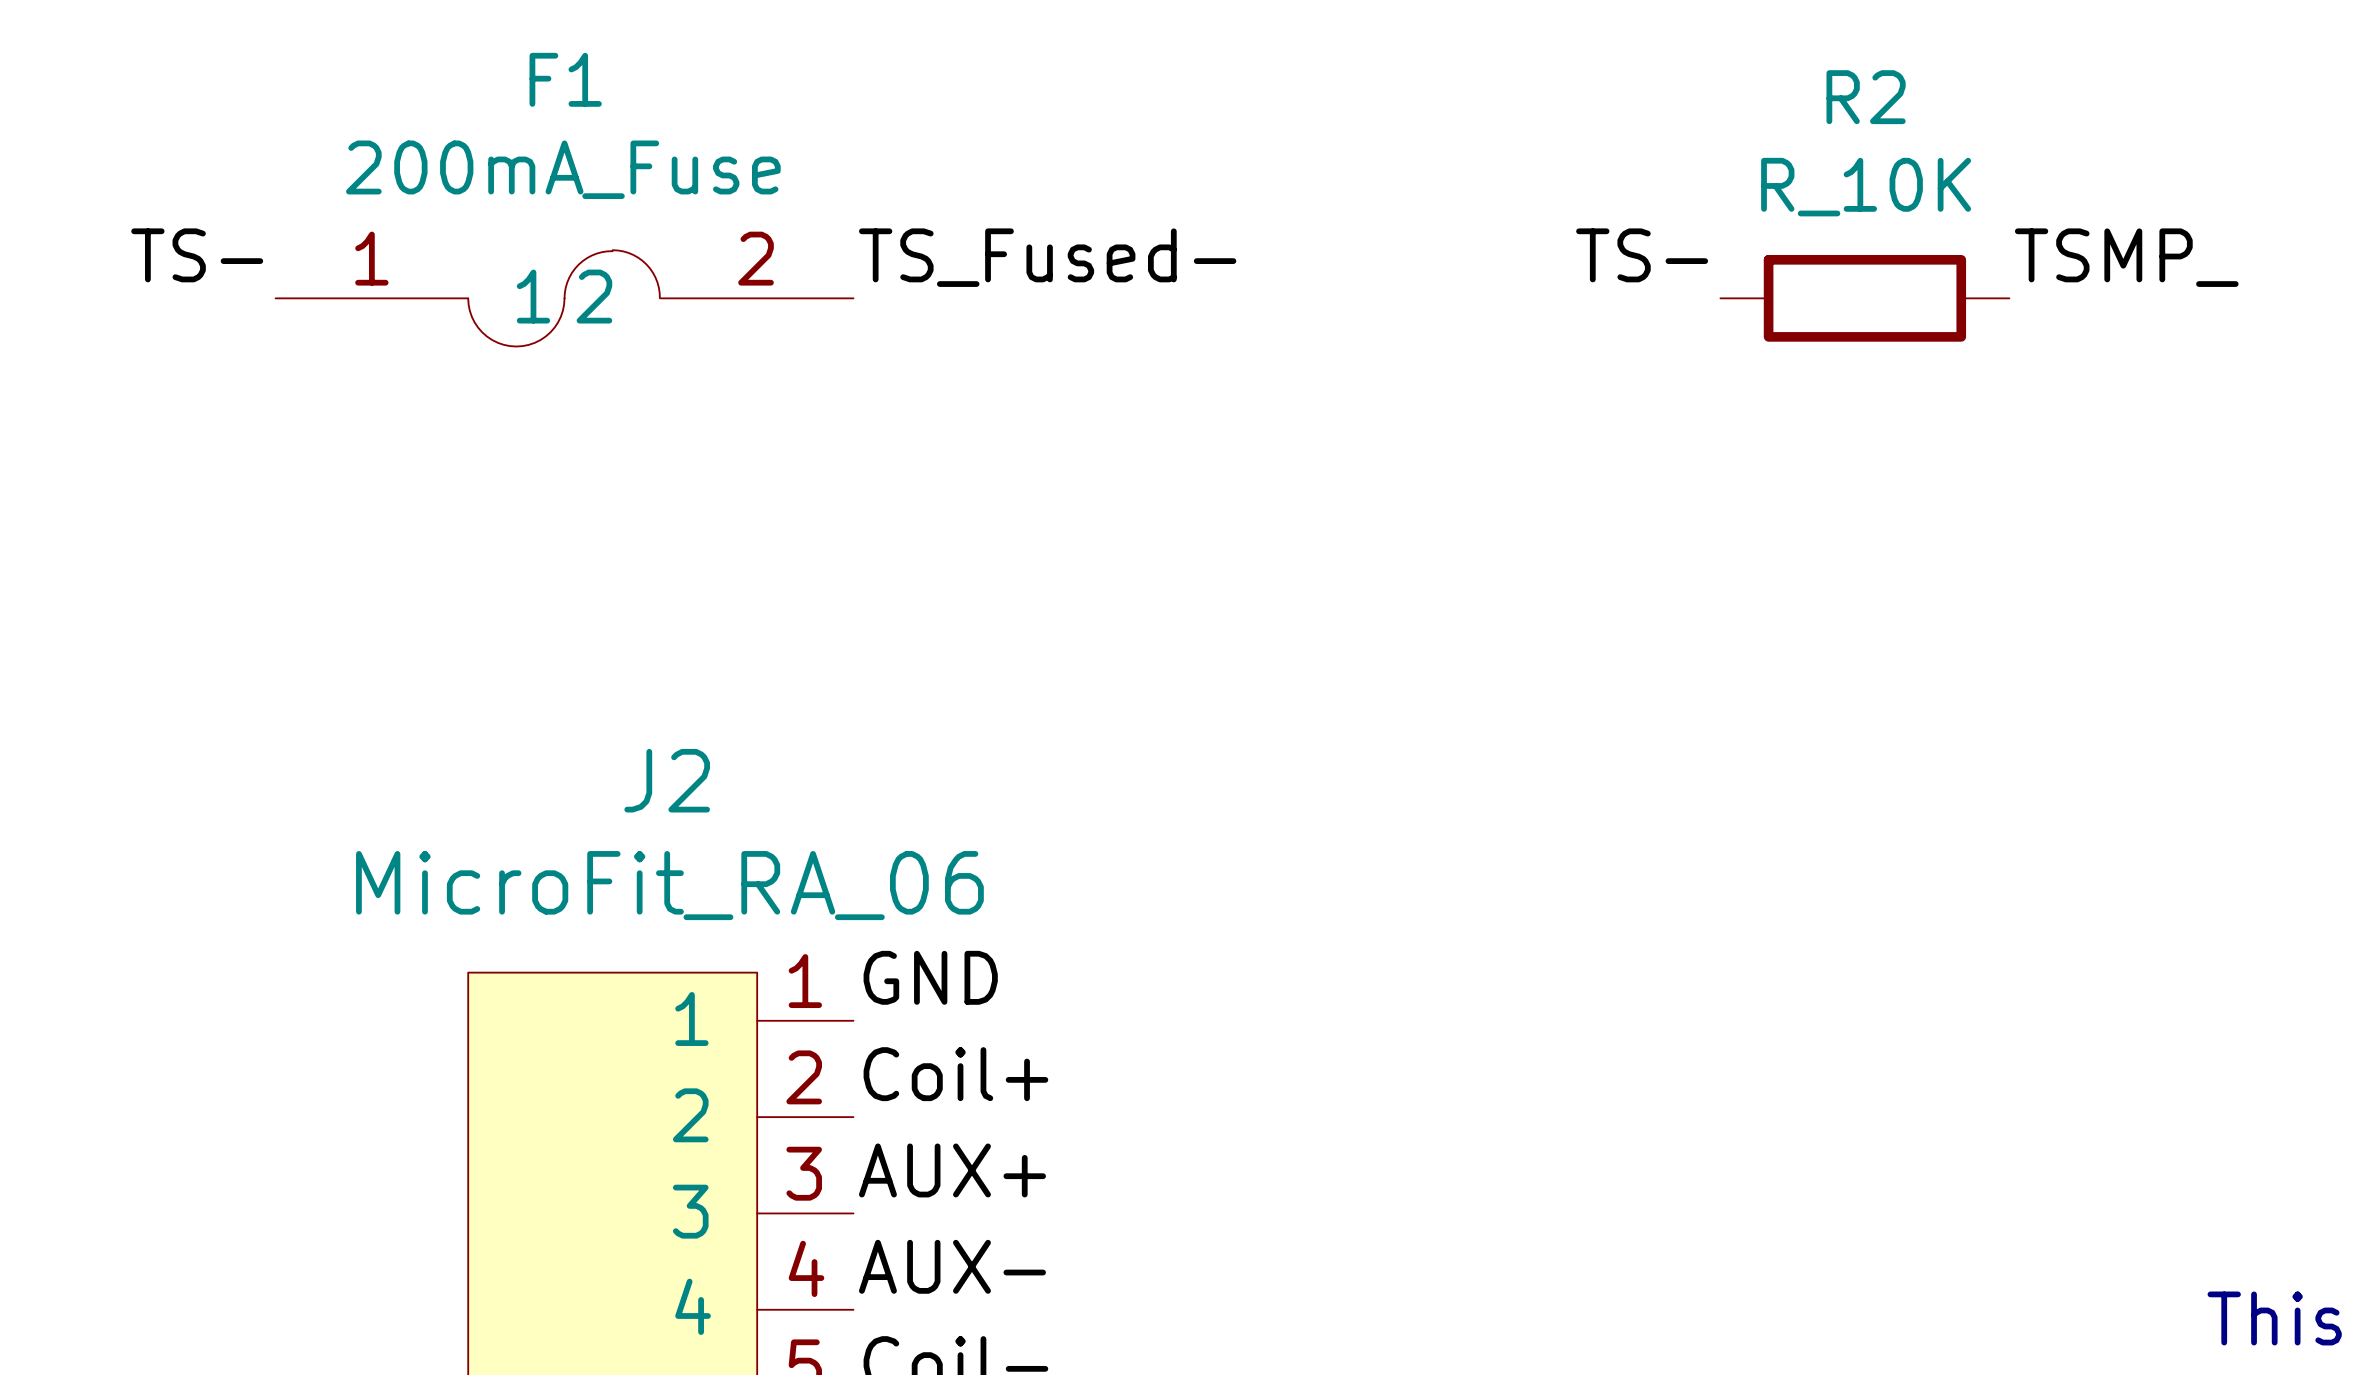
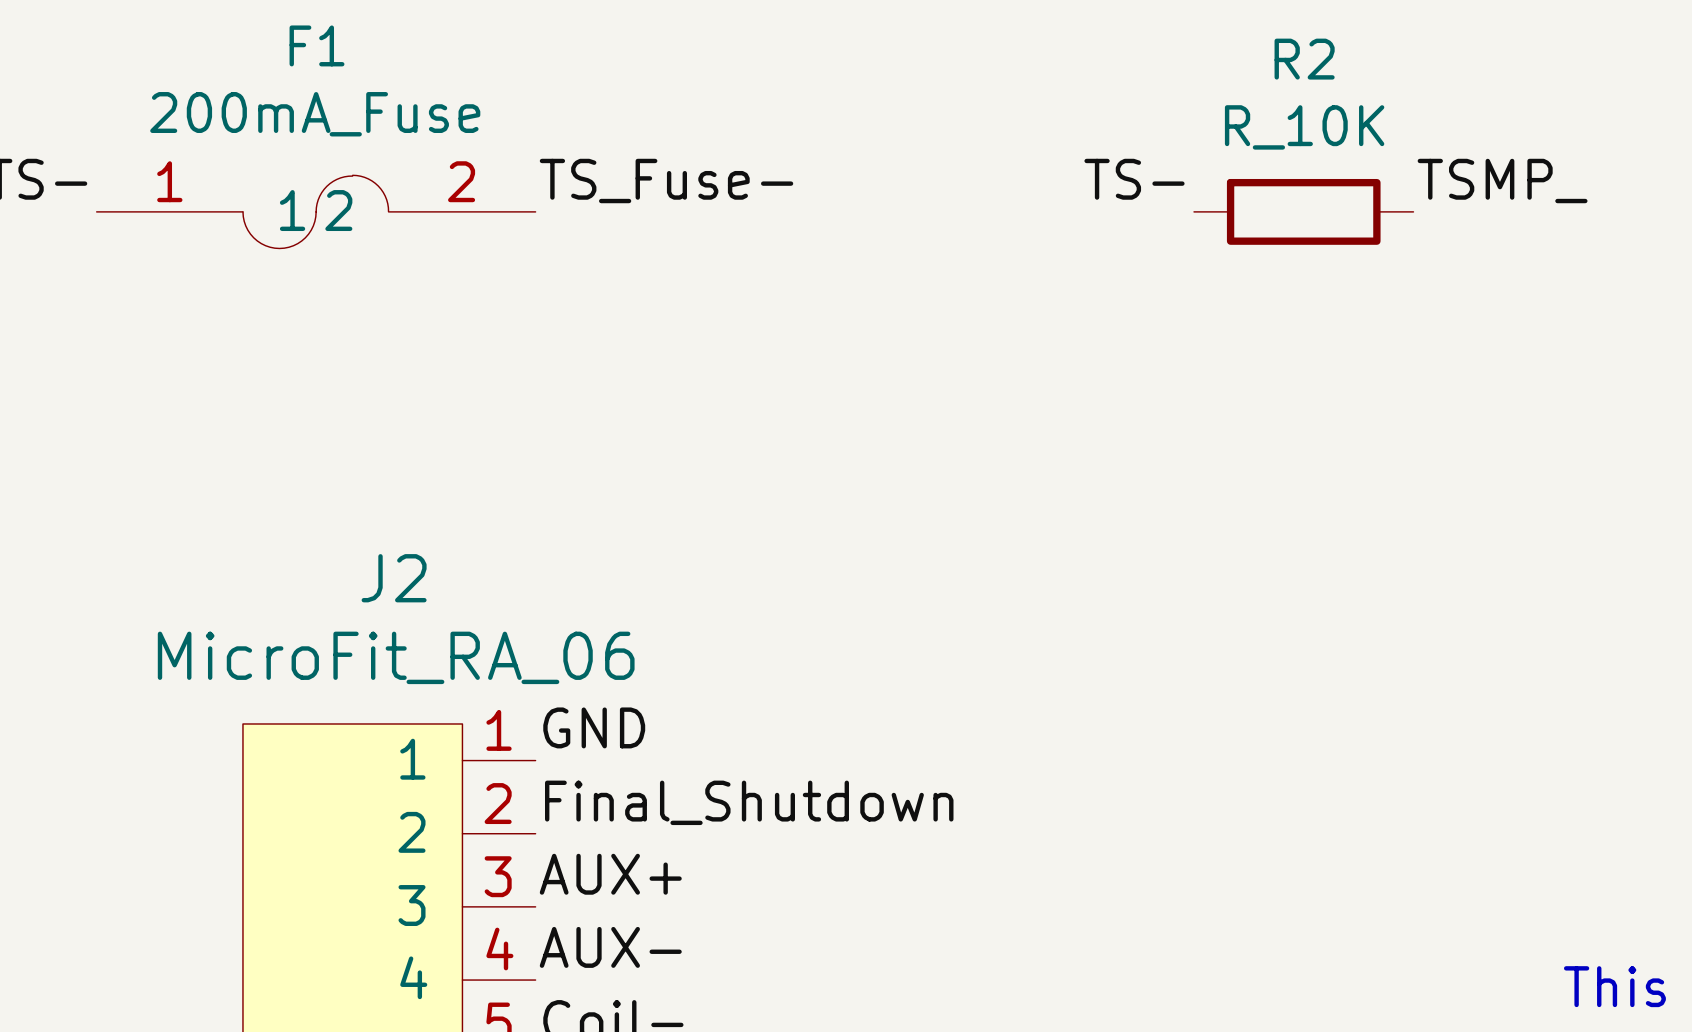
label: TS_Fused- (1047, 257) -> TS_Fuse- (666, 181)
label: Coil+ (955, 1074) -> Final_Shutdown (749, 802)

